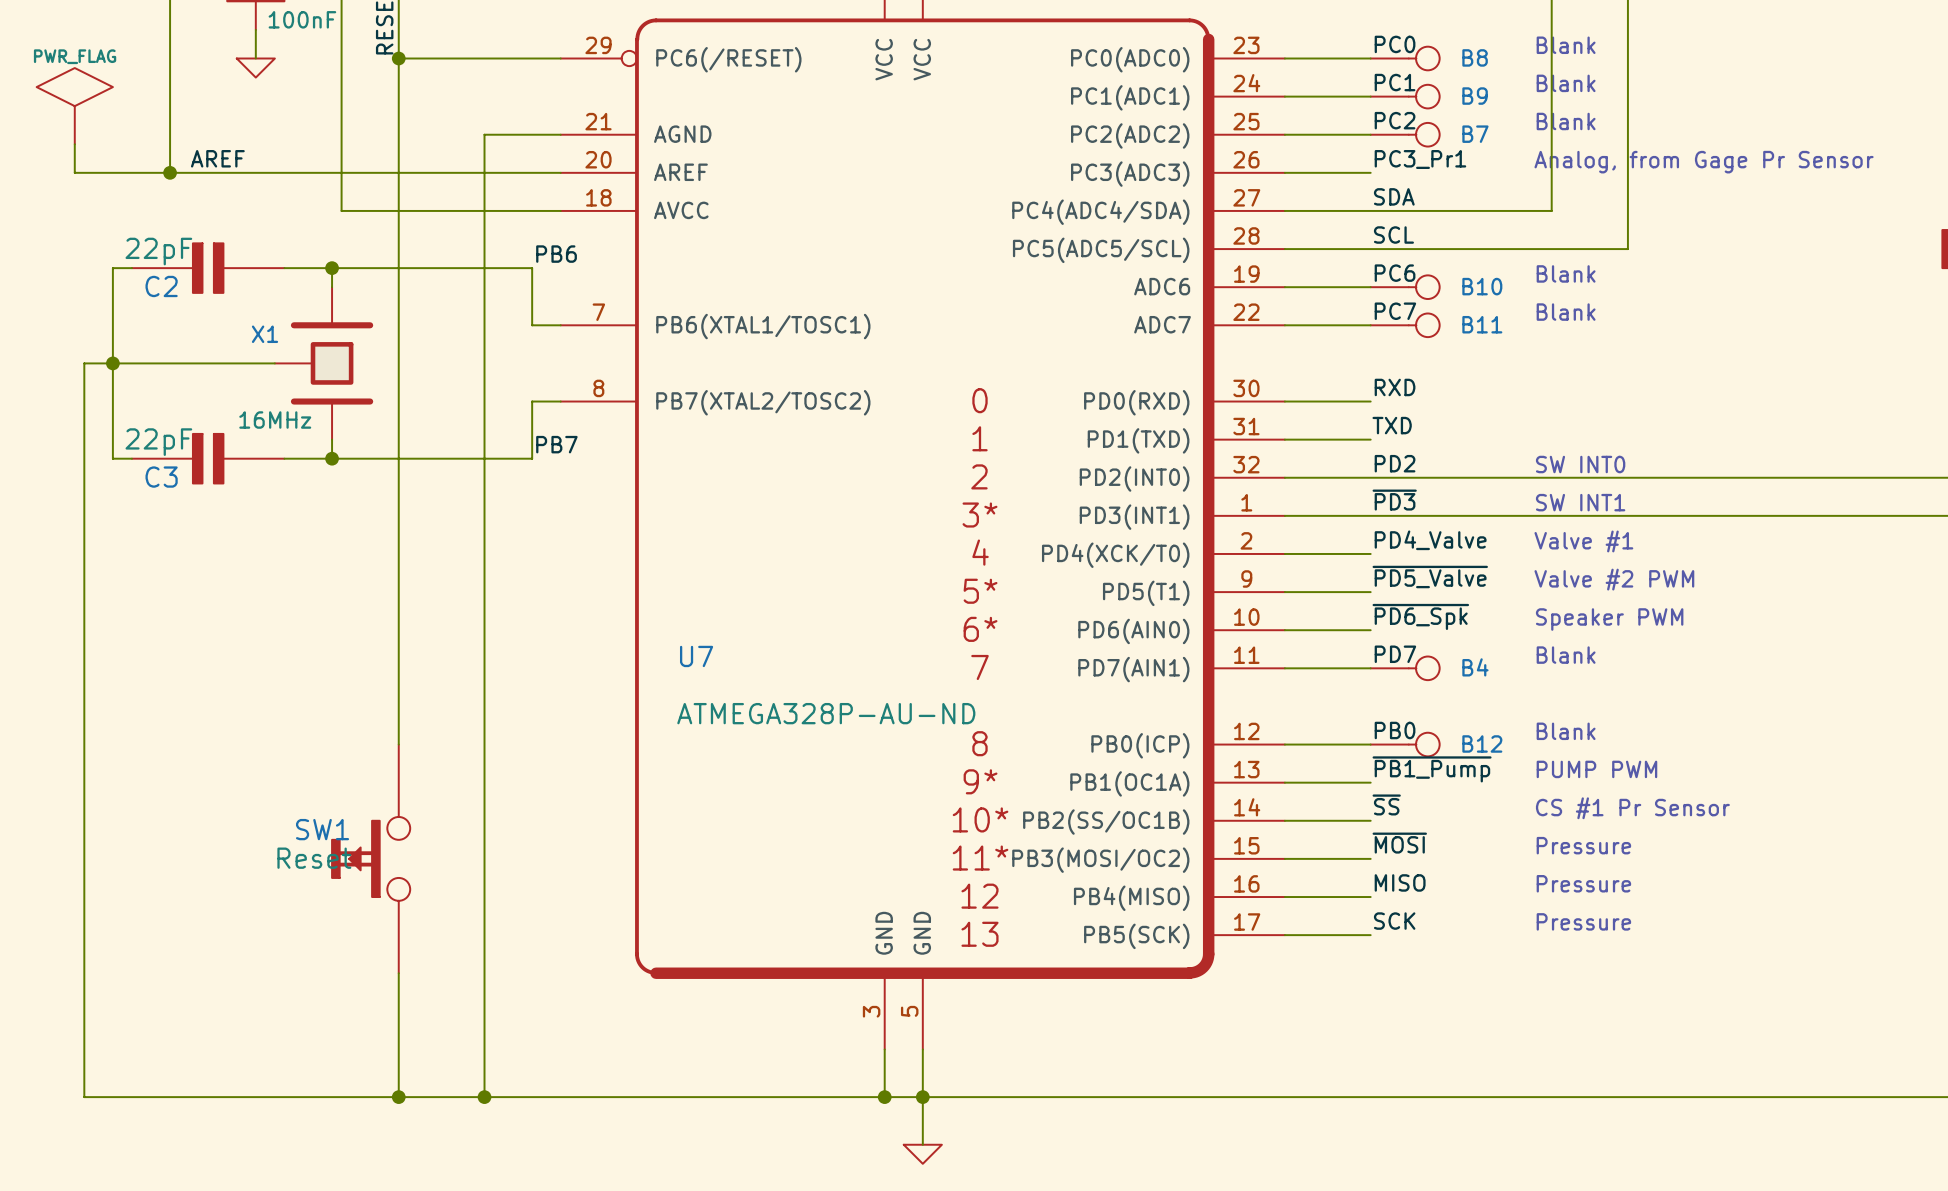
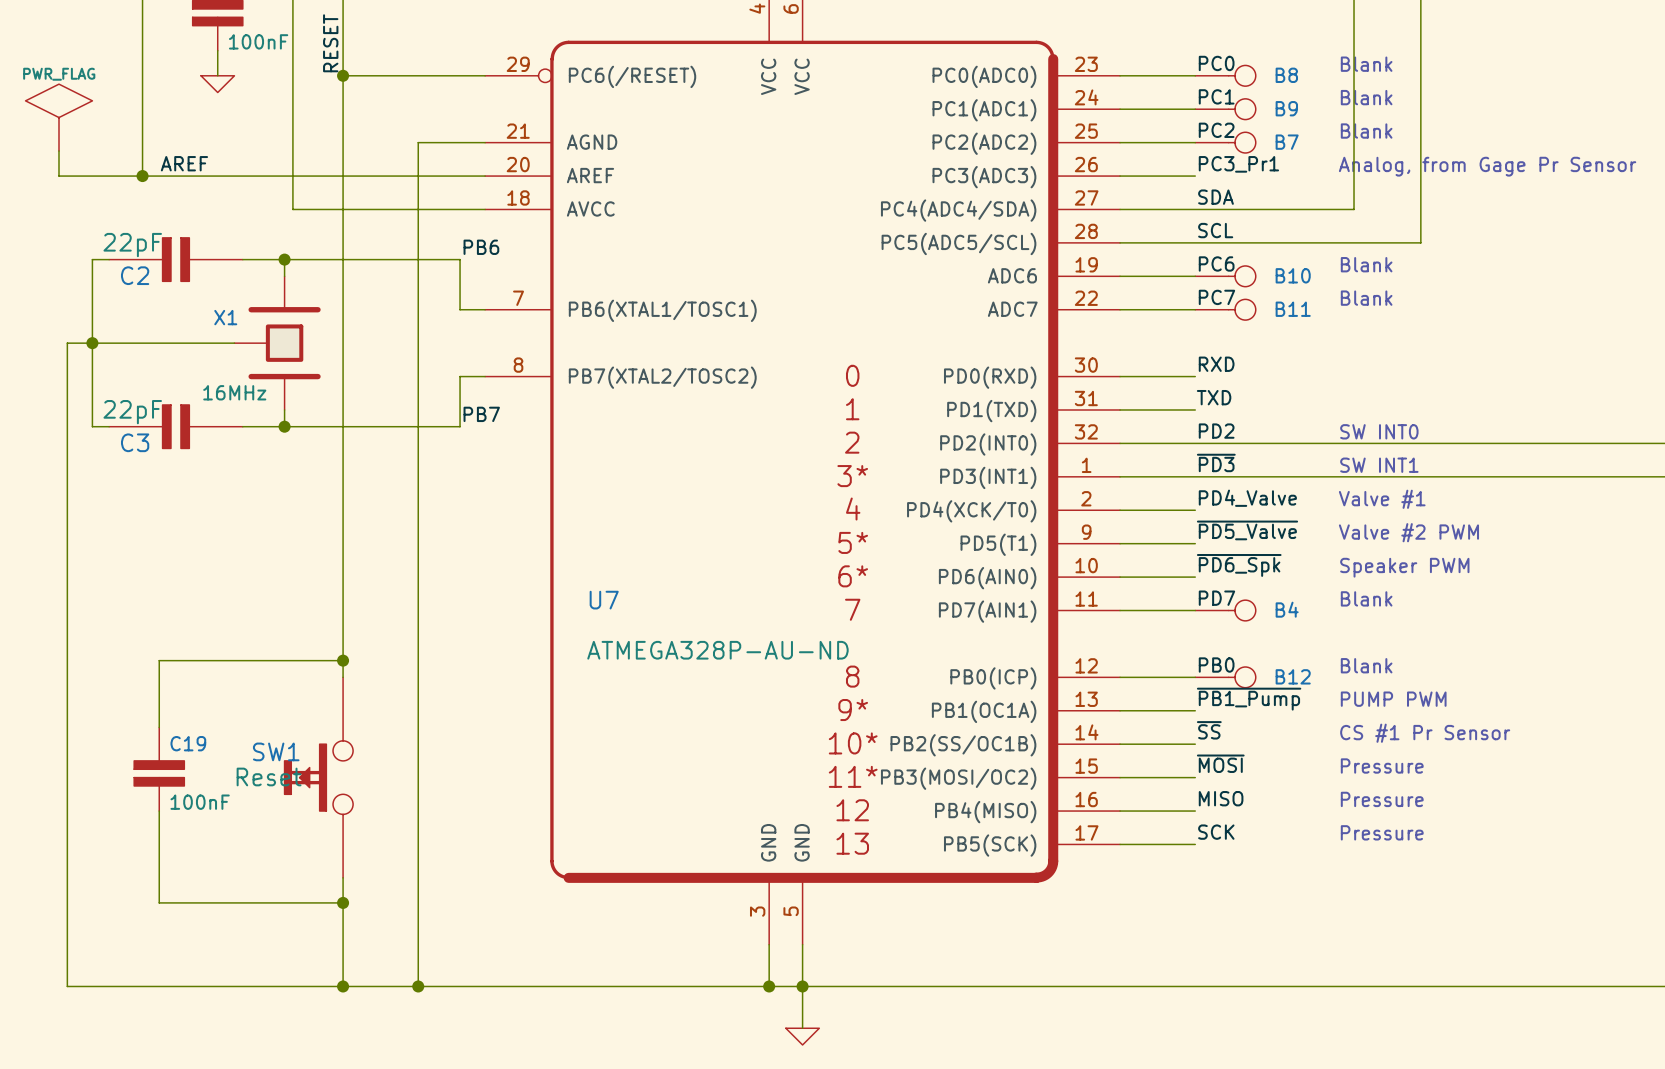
wire: none -> (343, 660) (159, 660) (159, 727)
junction: none -> (343, 660)
C19: none -> 100nF (159, 769)
wire: none -> (159, 811) (159, 902) (343, 902)
junction: none -> (343, 902)

